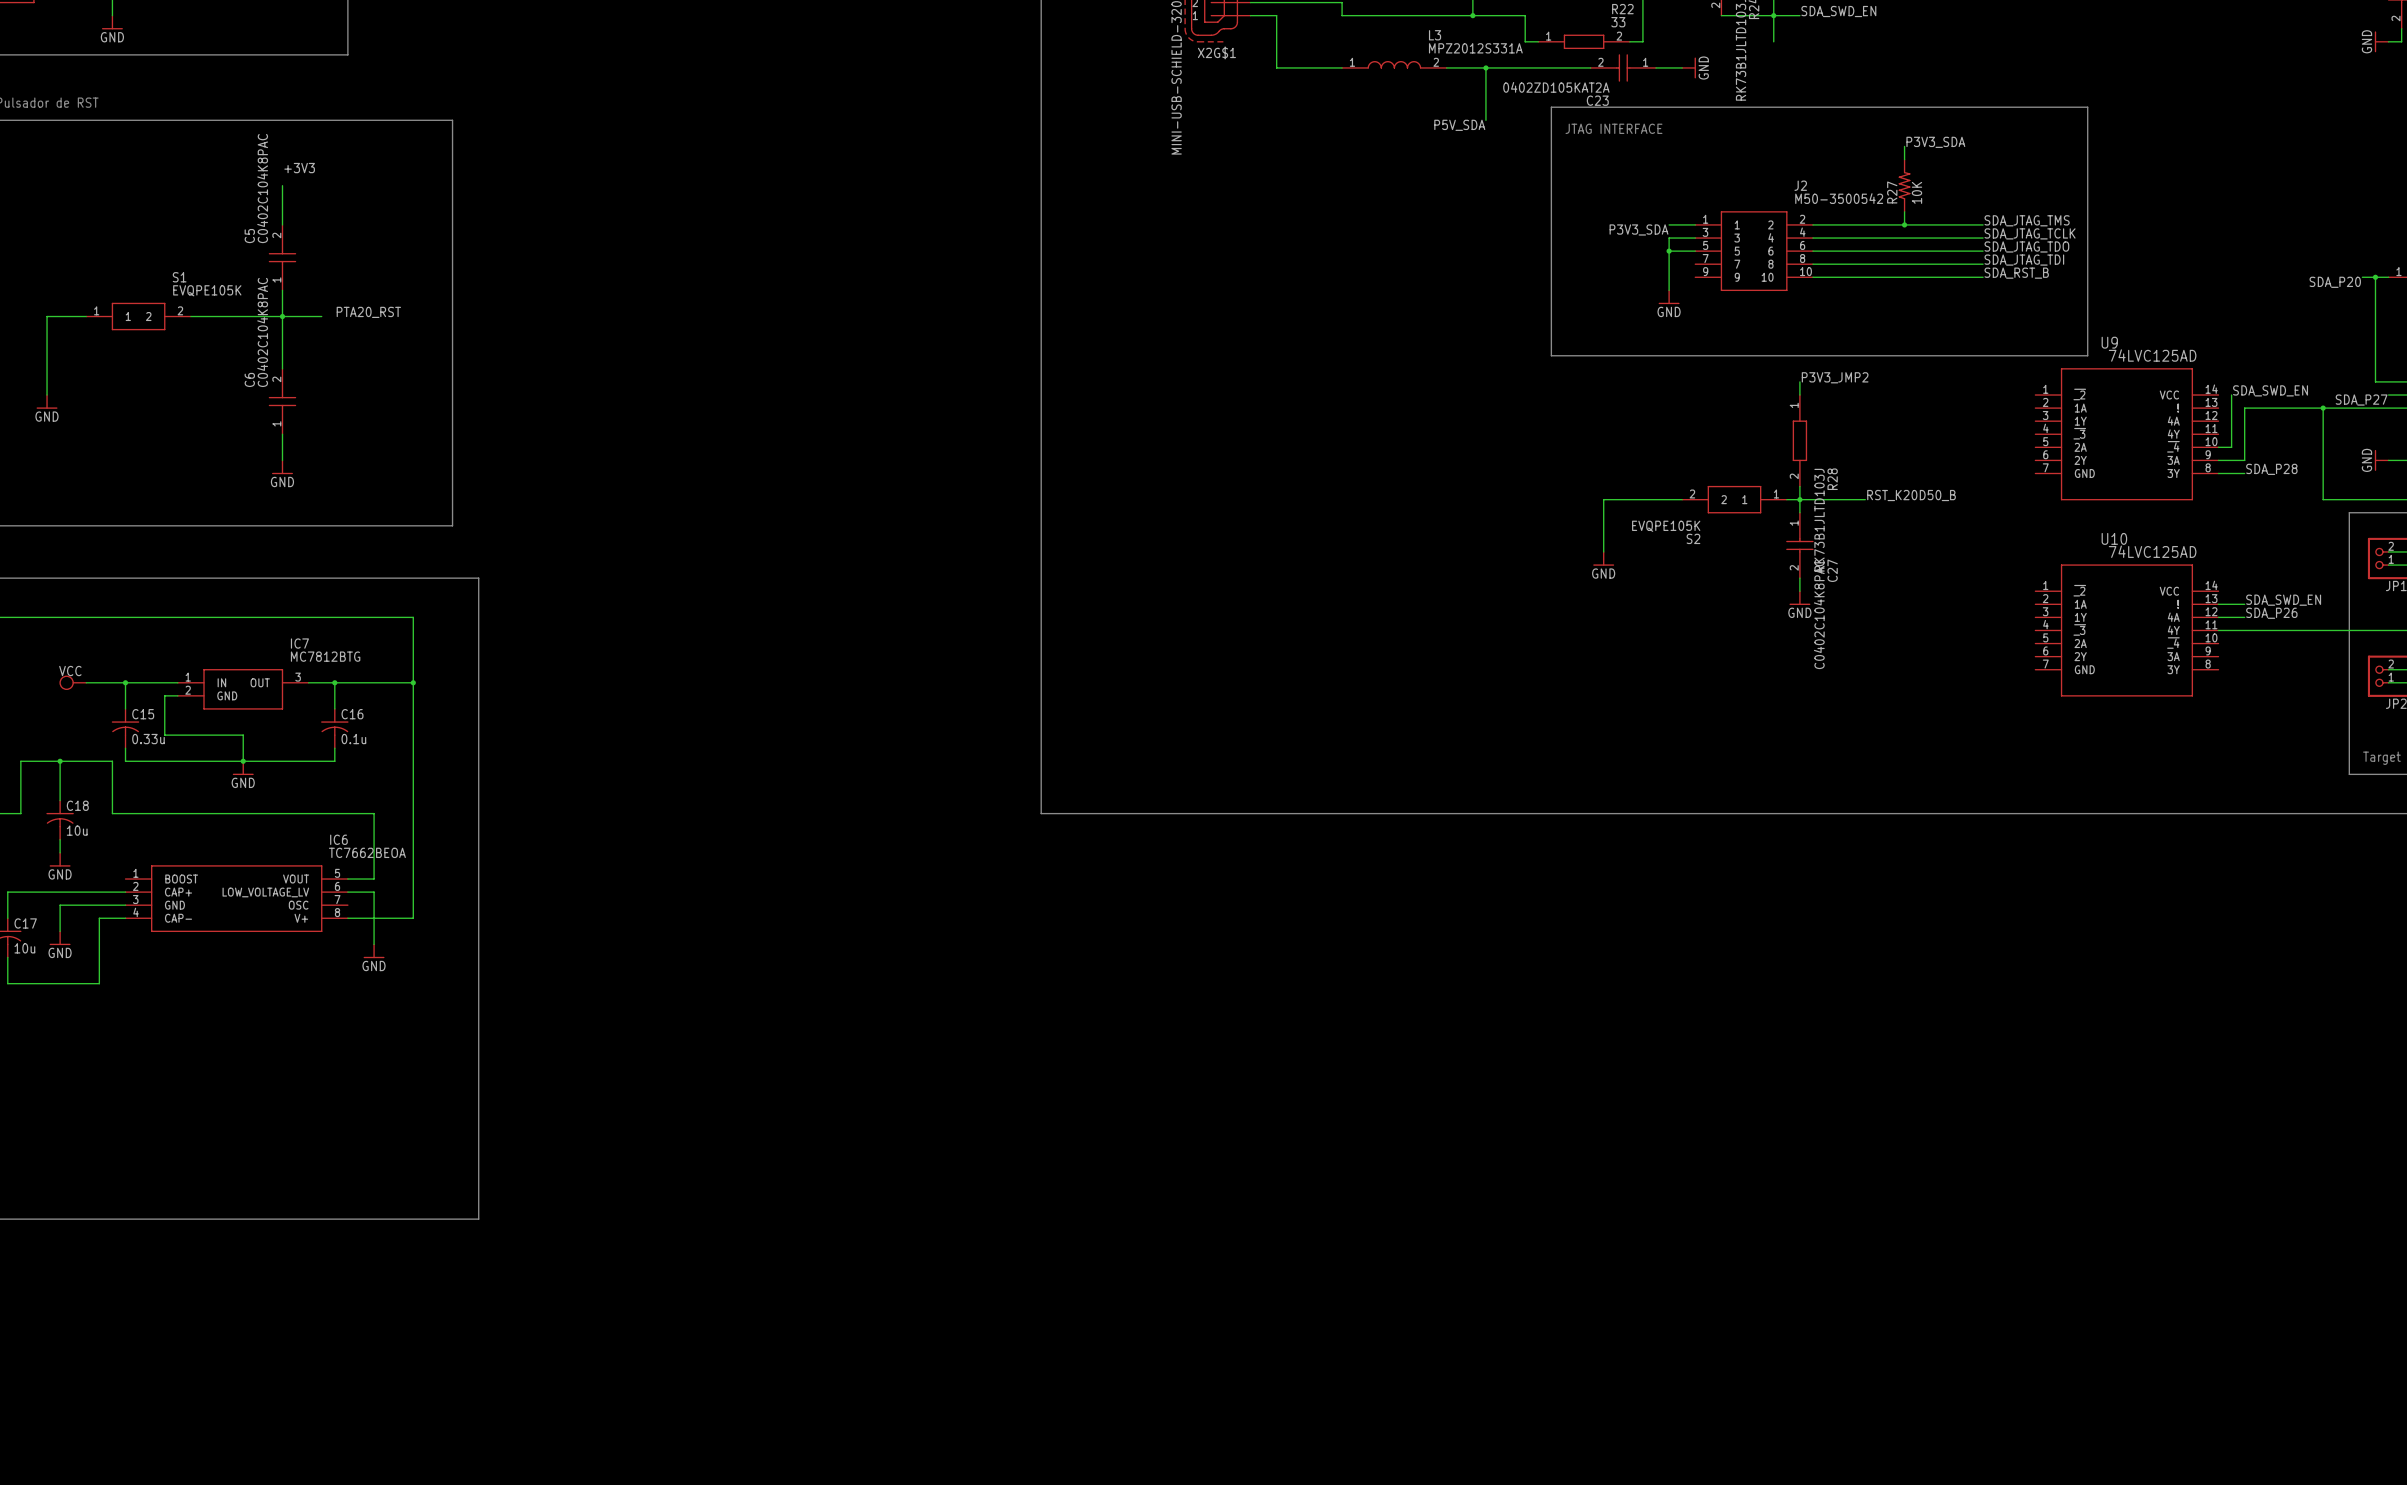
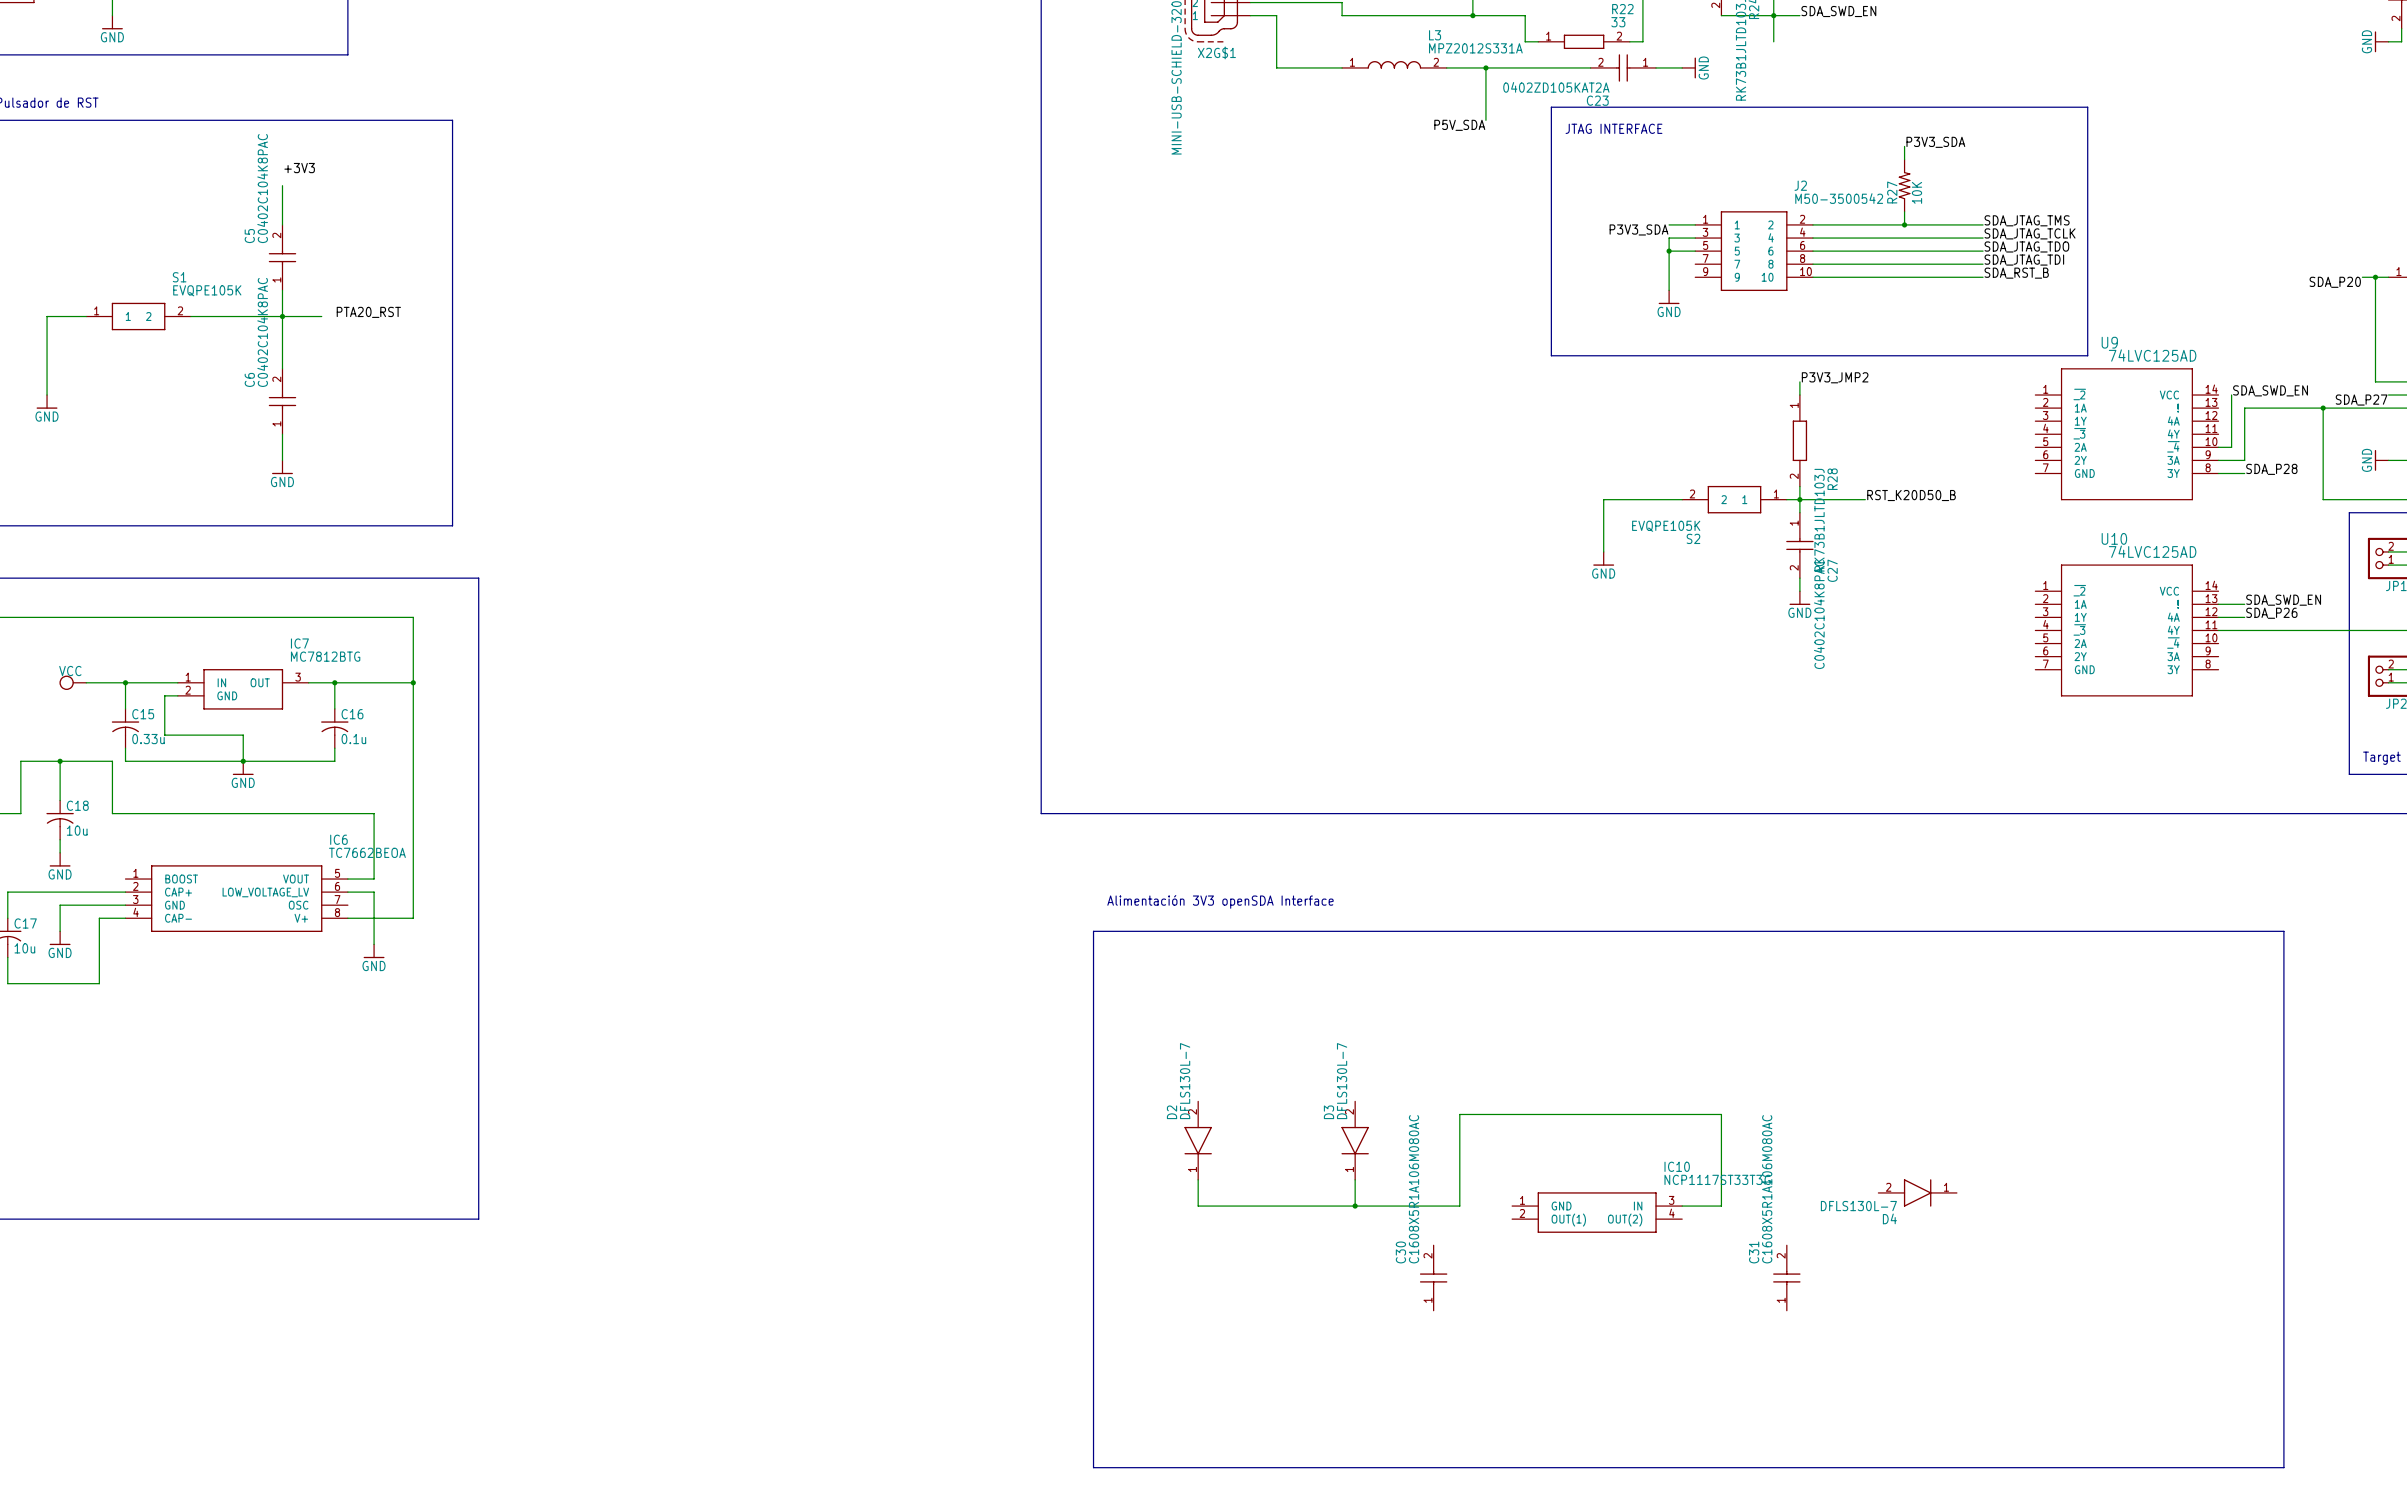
text: none -> Alimentación 3V3 openSDA Interface (1220, 901)
line: none -> (1093, 931) (2283, 931) (2283, 1467) (1093, 1467) (1093, 931)
D2: none -> DFLS130L-7 (1198, 1140)
D3: none -> DFLS130L-7 (1355, 1140)
wire: none -> (1198, 1179) (1198, 1206) (1459, 1206) (1459, 1114) (1721, 1114) (1721, 1206) (1682, 1206)
wire: none -> (1355, 1179) (1355, 1206)
D4: none -> DFLS130L-7 (1917, 1192)
junction: none -> (1355, 1206)
IC10: none -> NCP1117ST33T3G (1597, 1212)
C30: none -> C1608X5R1A106M080AC (1433, 1277)
C31: none -> C1608X5R1A106M080AC (1786, 1277)

